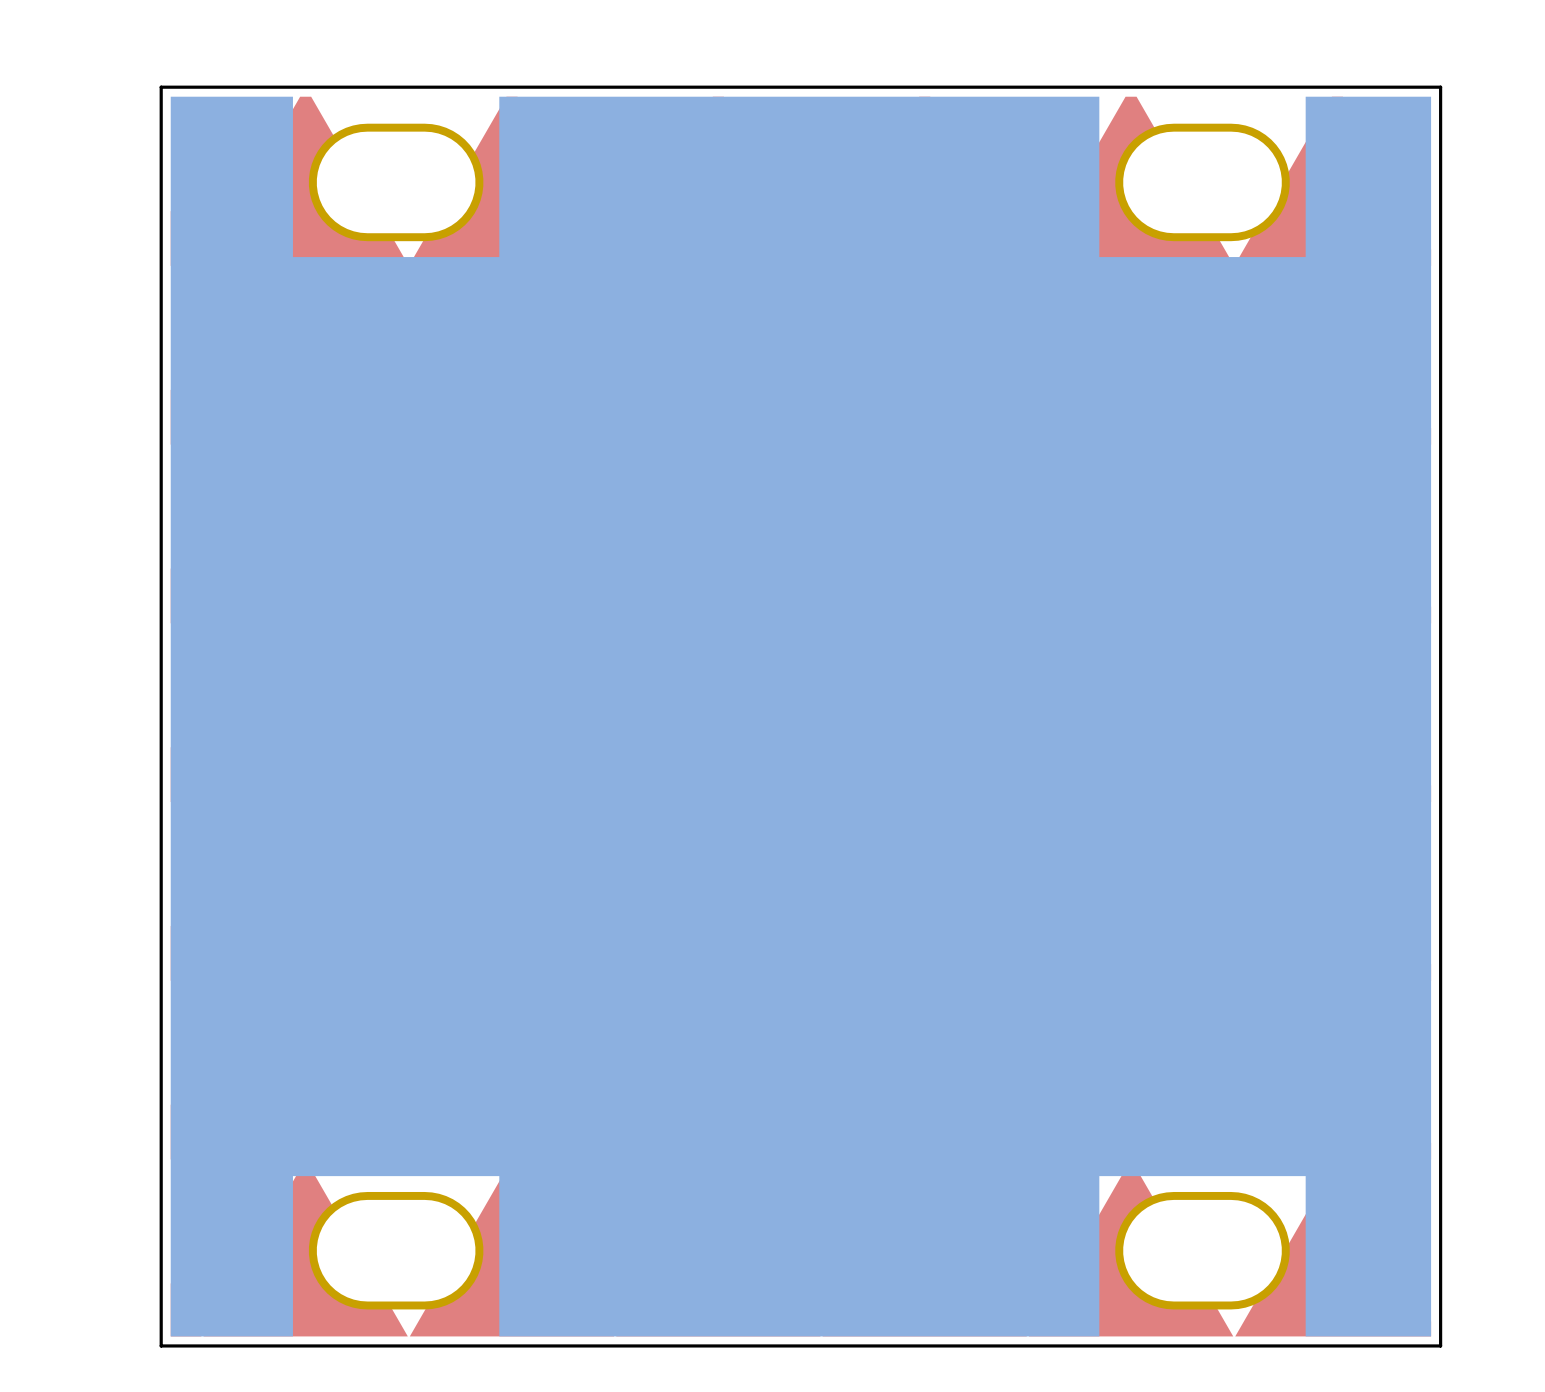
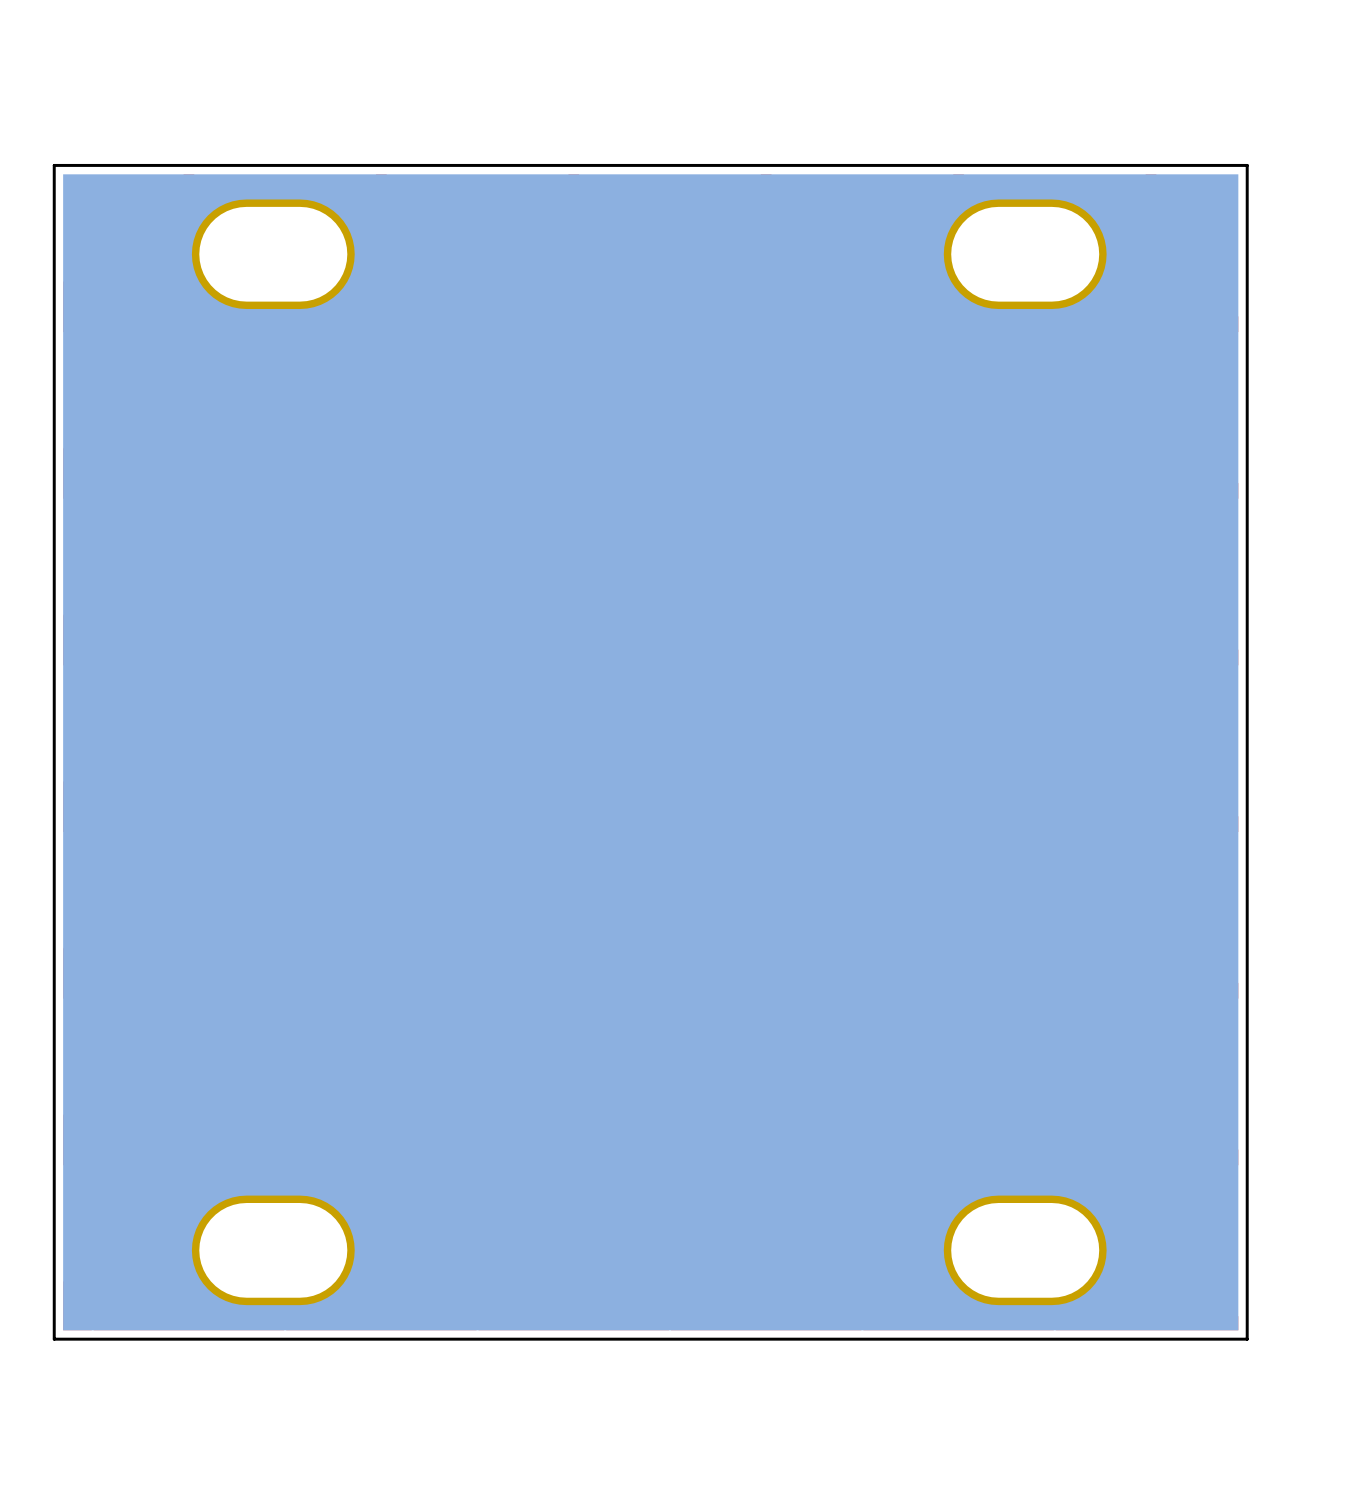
drawing: [170, 96, 293, 1337] -> none
drawing: [499, 96, 1100, 258] -> none
drawing: [1305, 96, 1432, 1337] -> none
drawing shape: [292, 257, 1306, 1177] -> [63, 174, 1239, 1331]
drawing: [499, 1176, 1100, 1337] -> none

